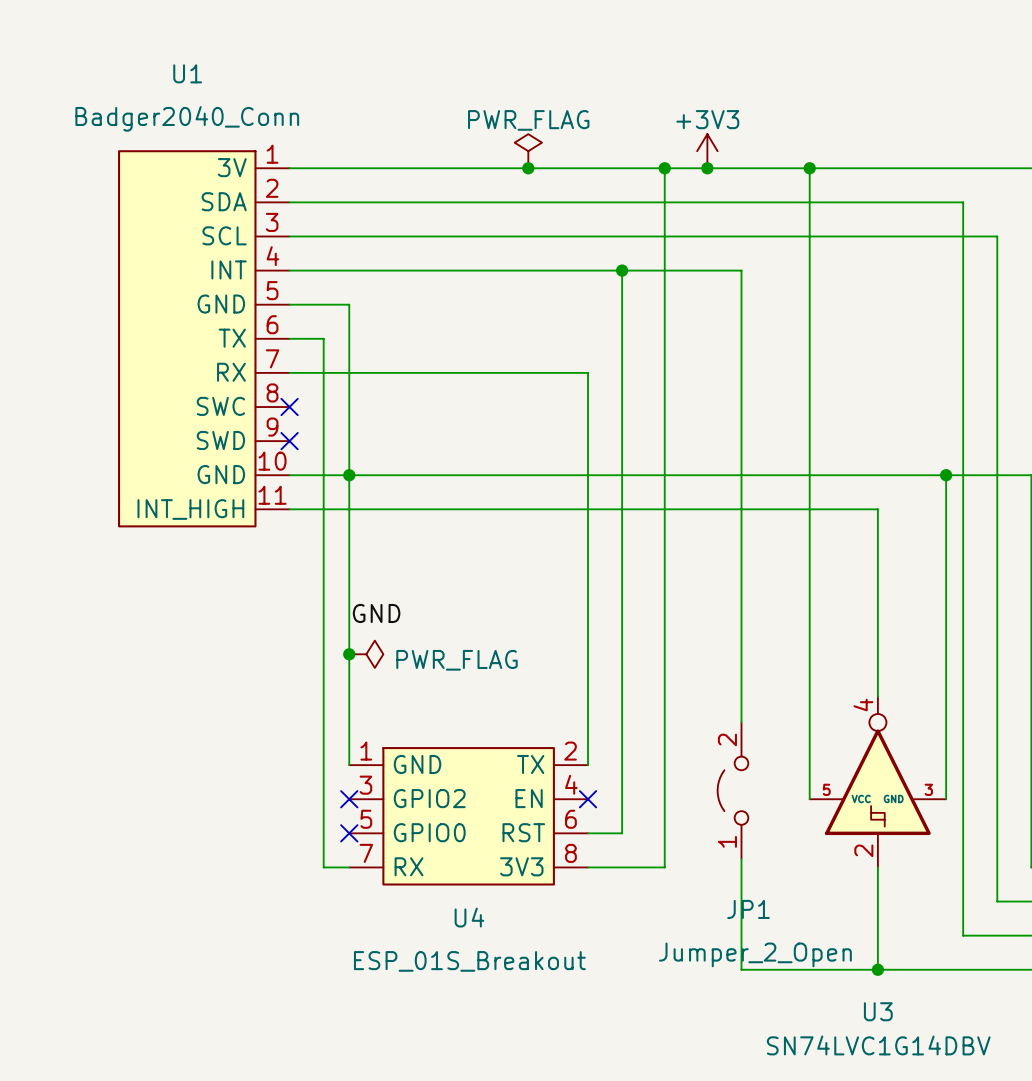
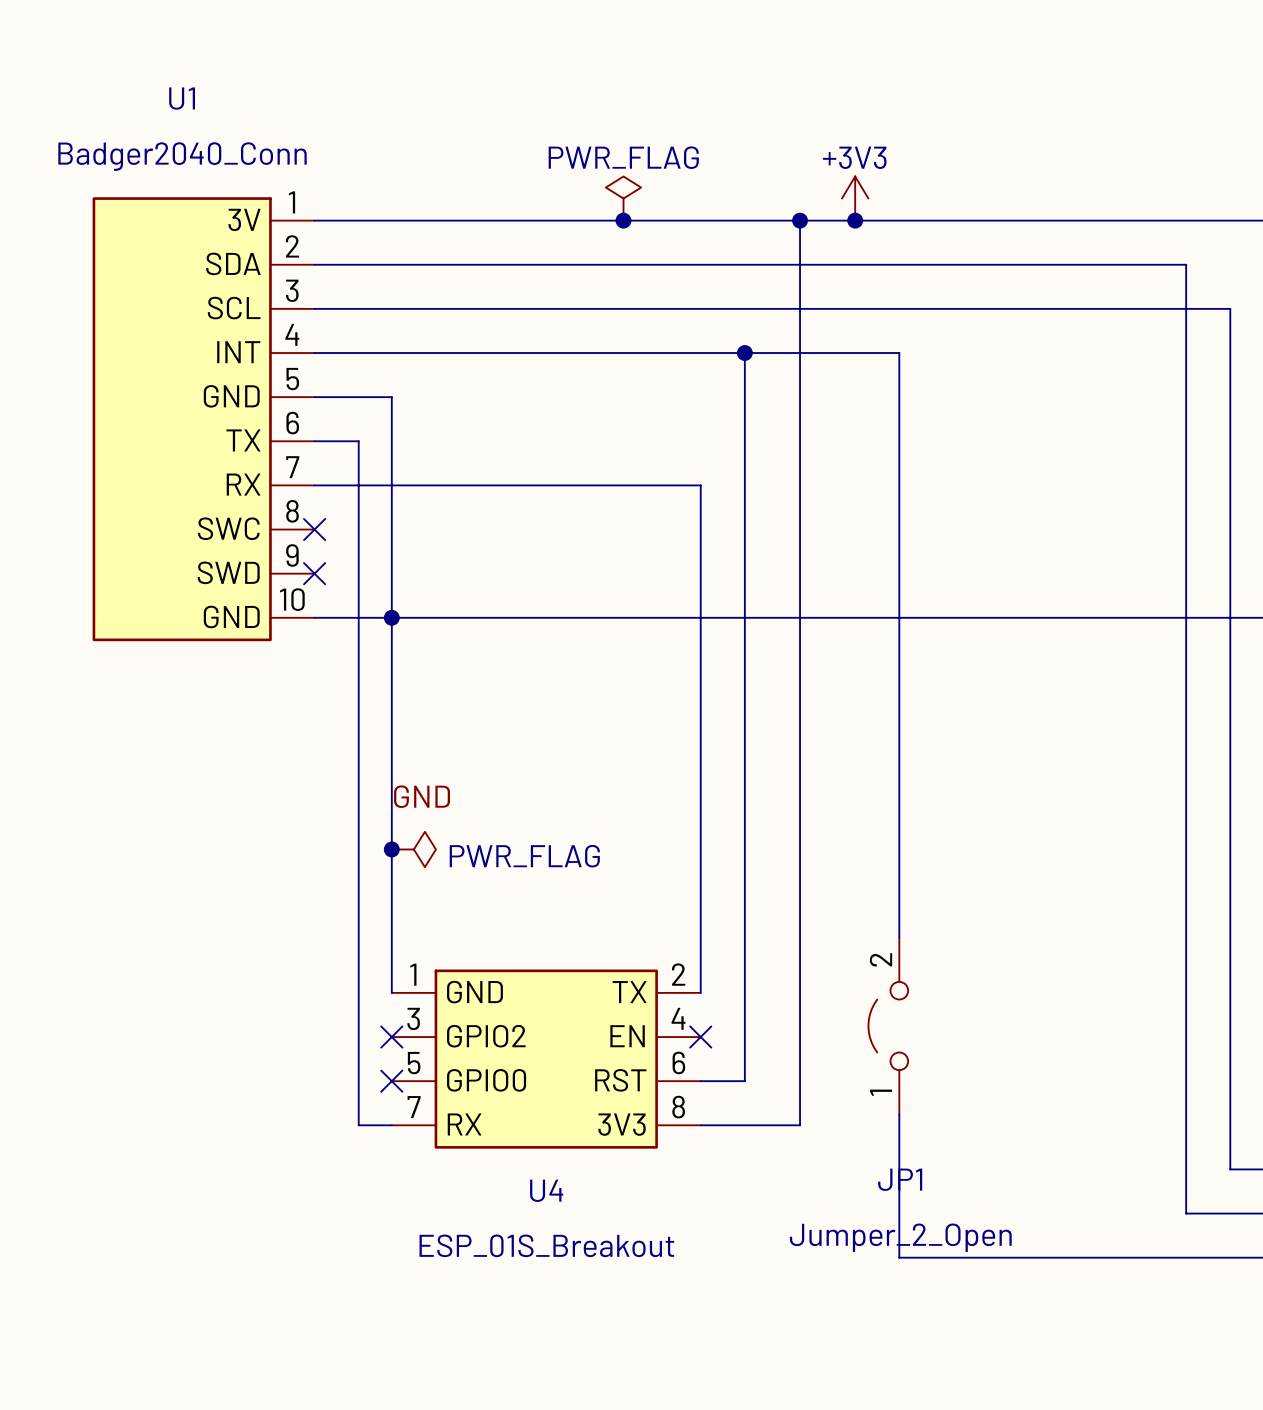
U1 symbol: [118, 150, 290, 528] -> [92, 197, 315, 642]
wire: (809, 168) (809, 799) -> none
junction: (809, 168) -> none
wire: (946, 475) (946, 799) -> none
junction: (946, 475) -> none
wire: (289, 509) (877, 509) (877, 696) -> none
U3: SN74LVC1G14DBV (877, 782) -> none
wire: (877, 867) (877, 969) -> none
junction: (877, 969) -> none

